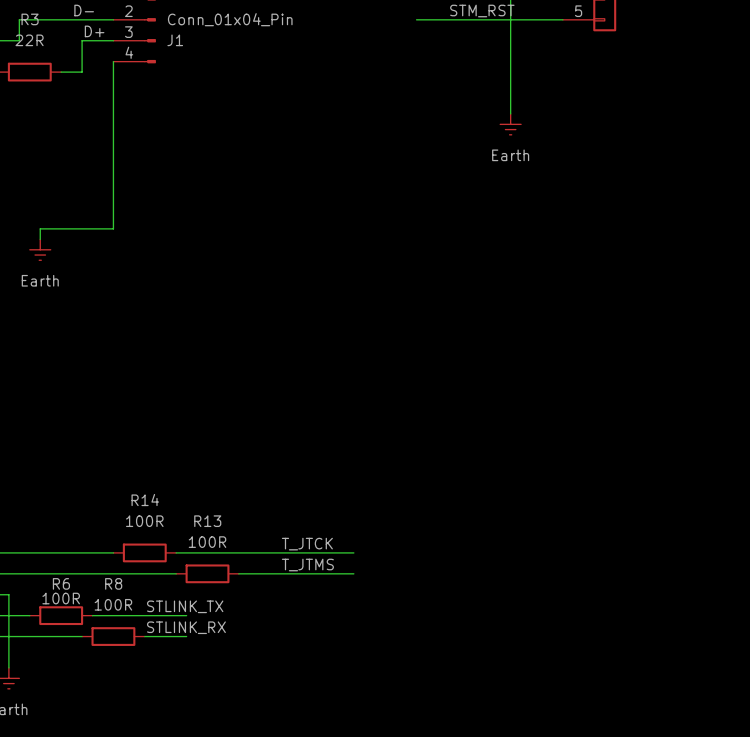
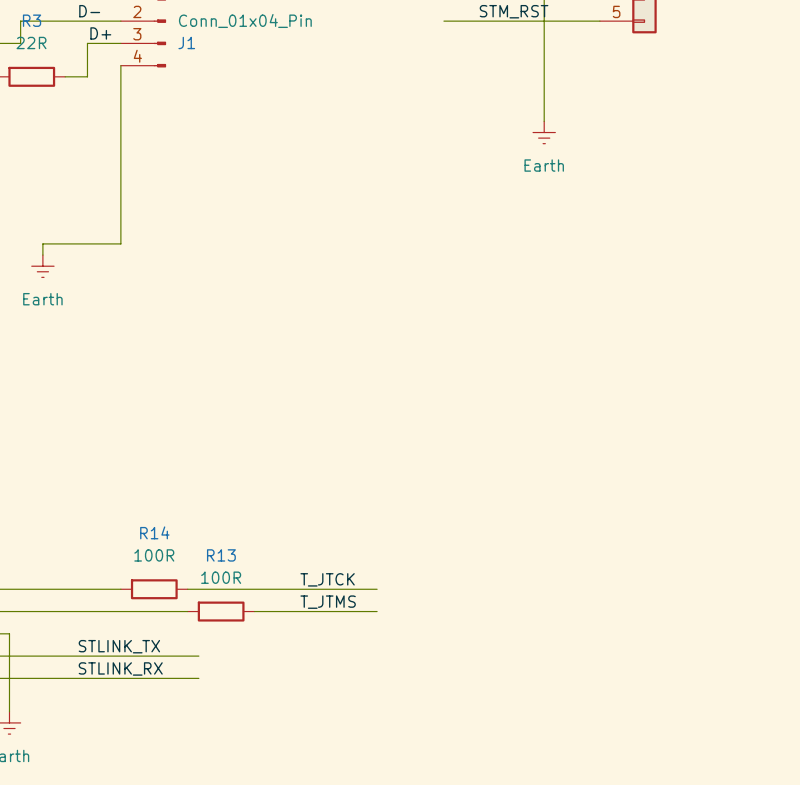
label position: STLINK_TX (185, 606) -> STLINK_TX (119, 646)
wire: none -> (31, 656) (98, 656)
R6: 100R (61, 615) -> none
label position: STLINK_RX (186, 627) -> STLINK_RX (120, 668)
wire: none -> (87, 678) (154, 678)
R8: 100R (113, 636) -> none

